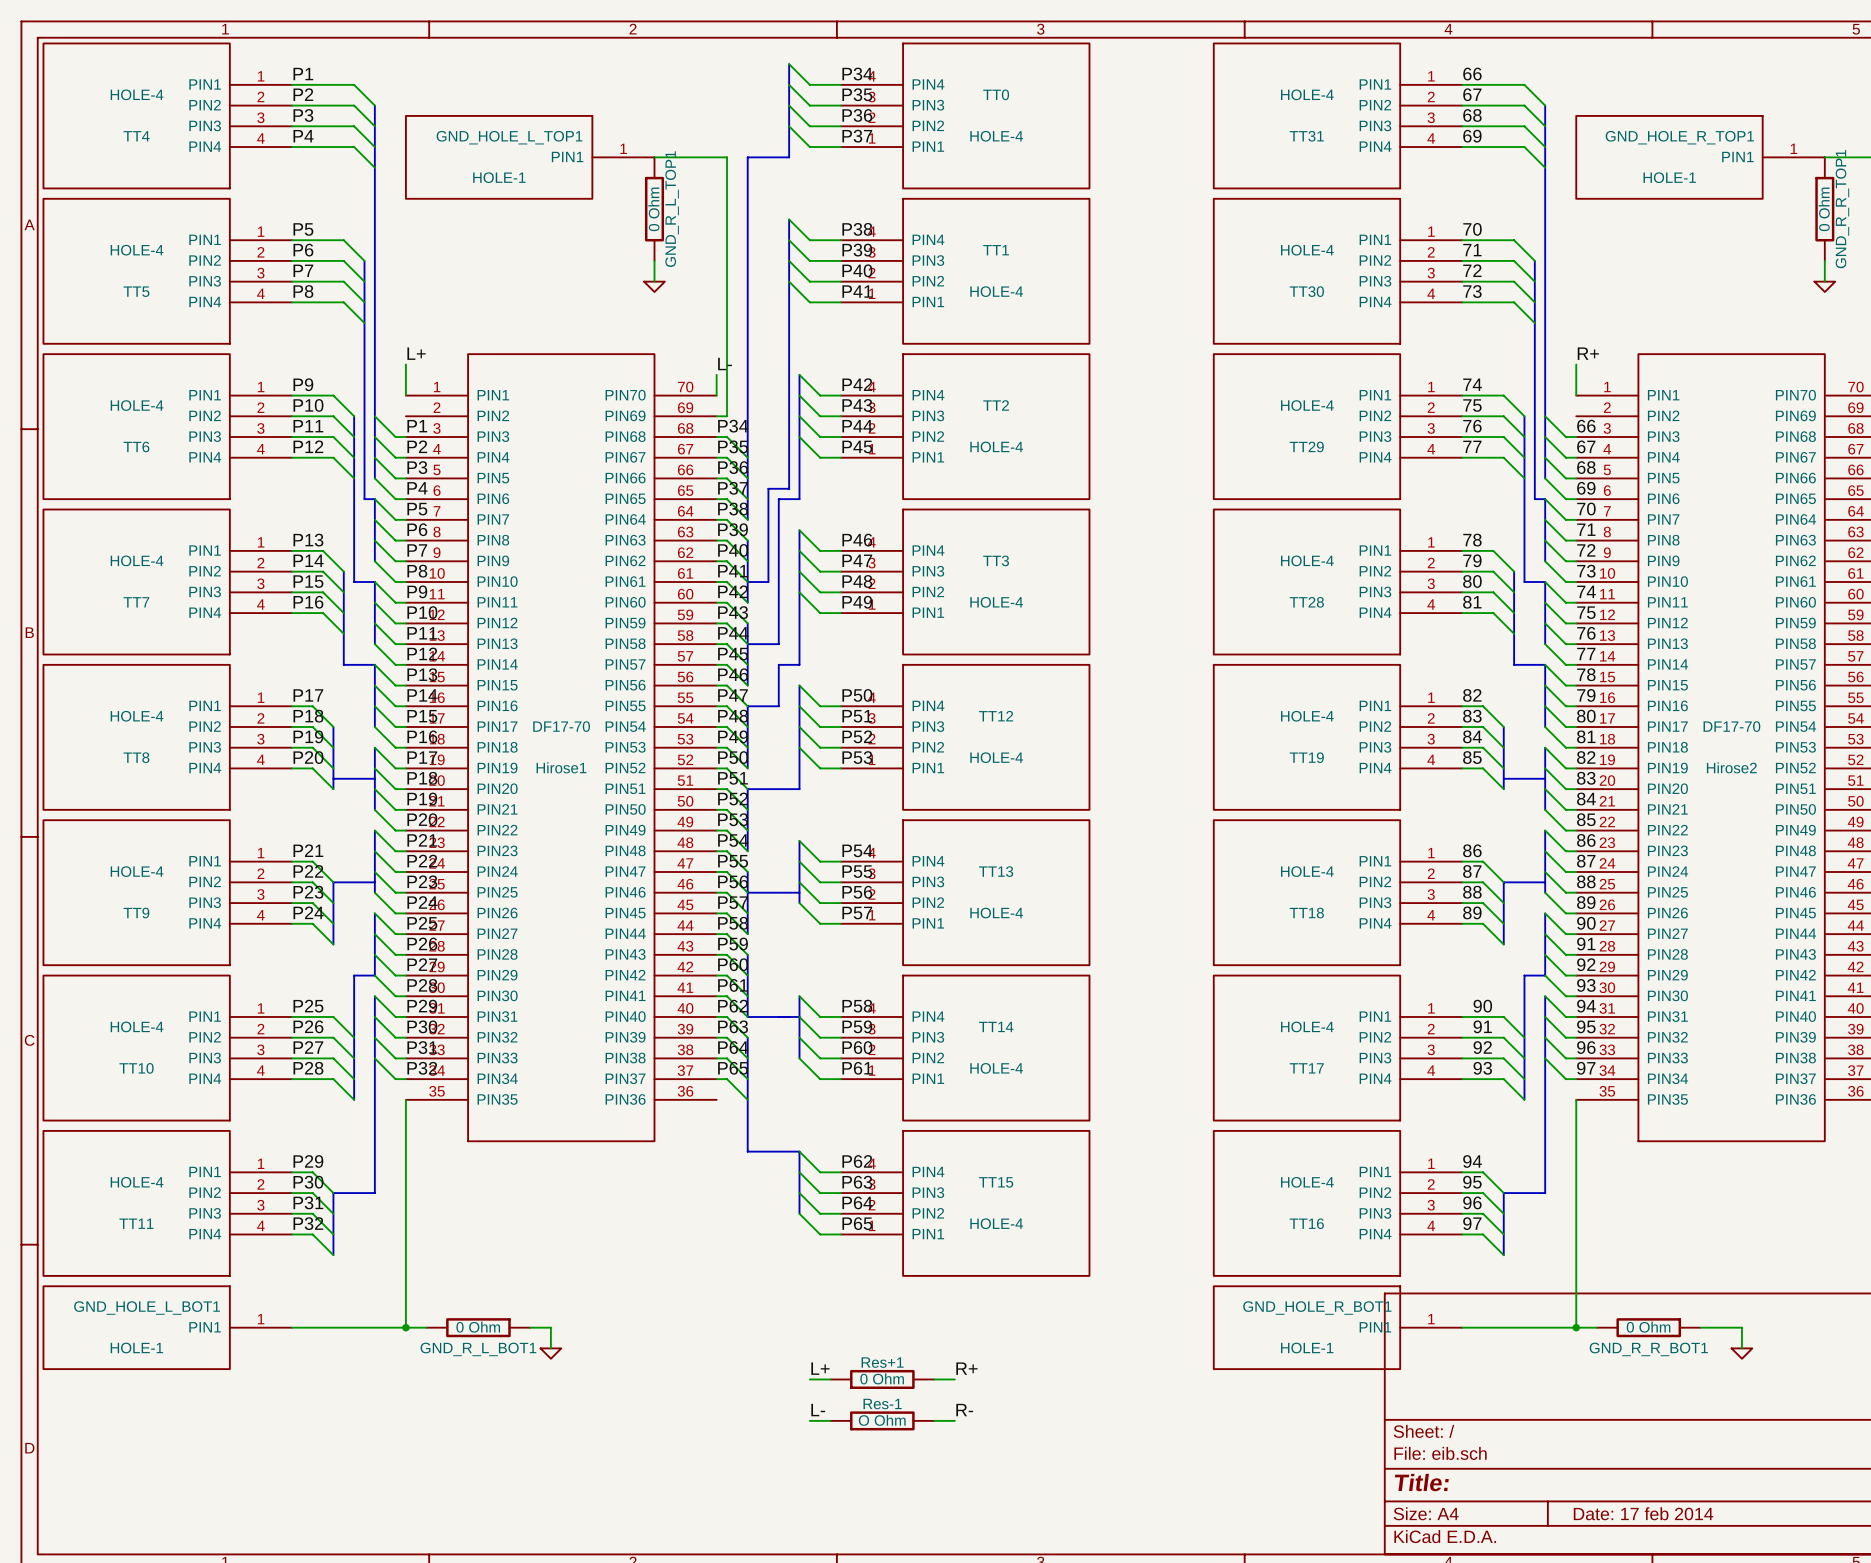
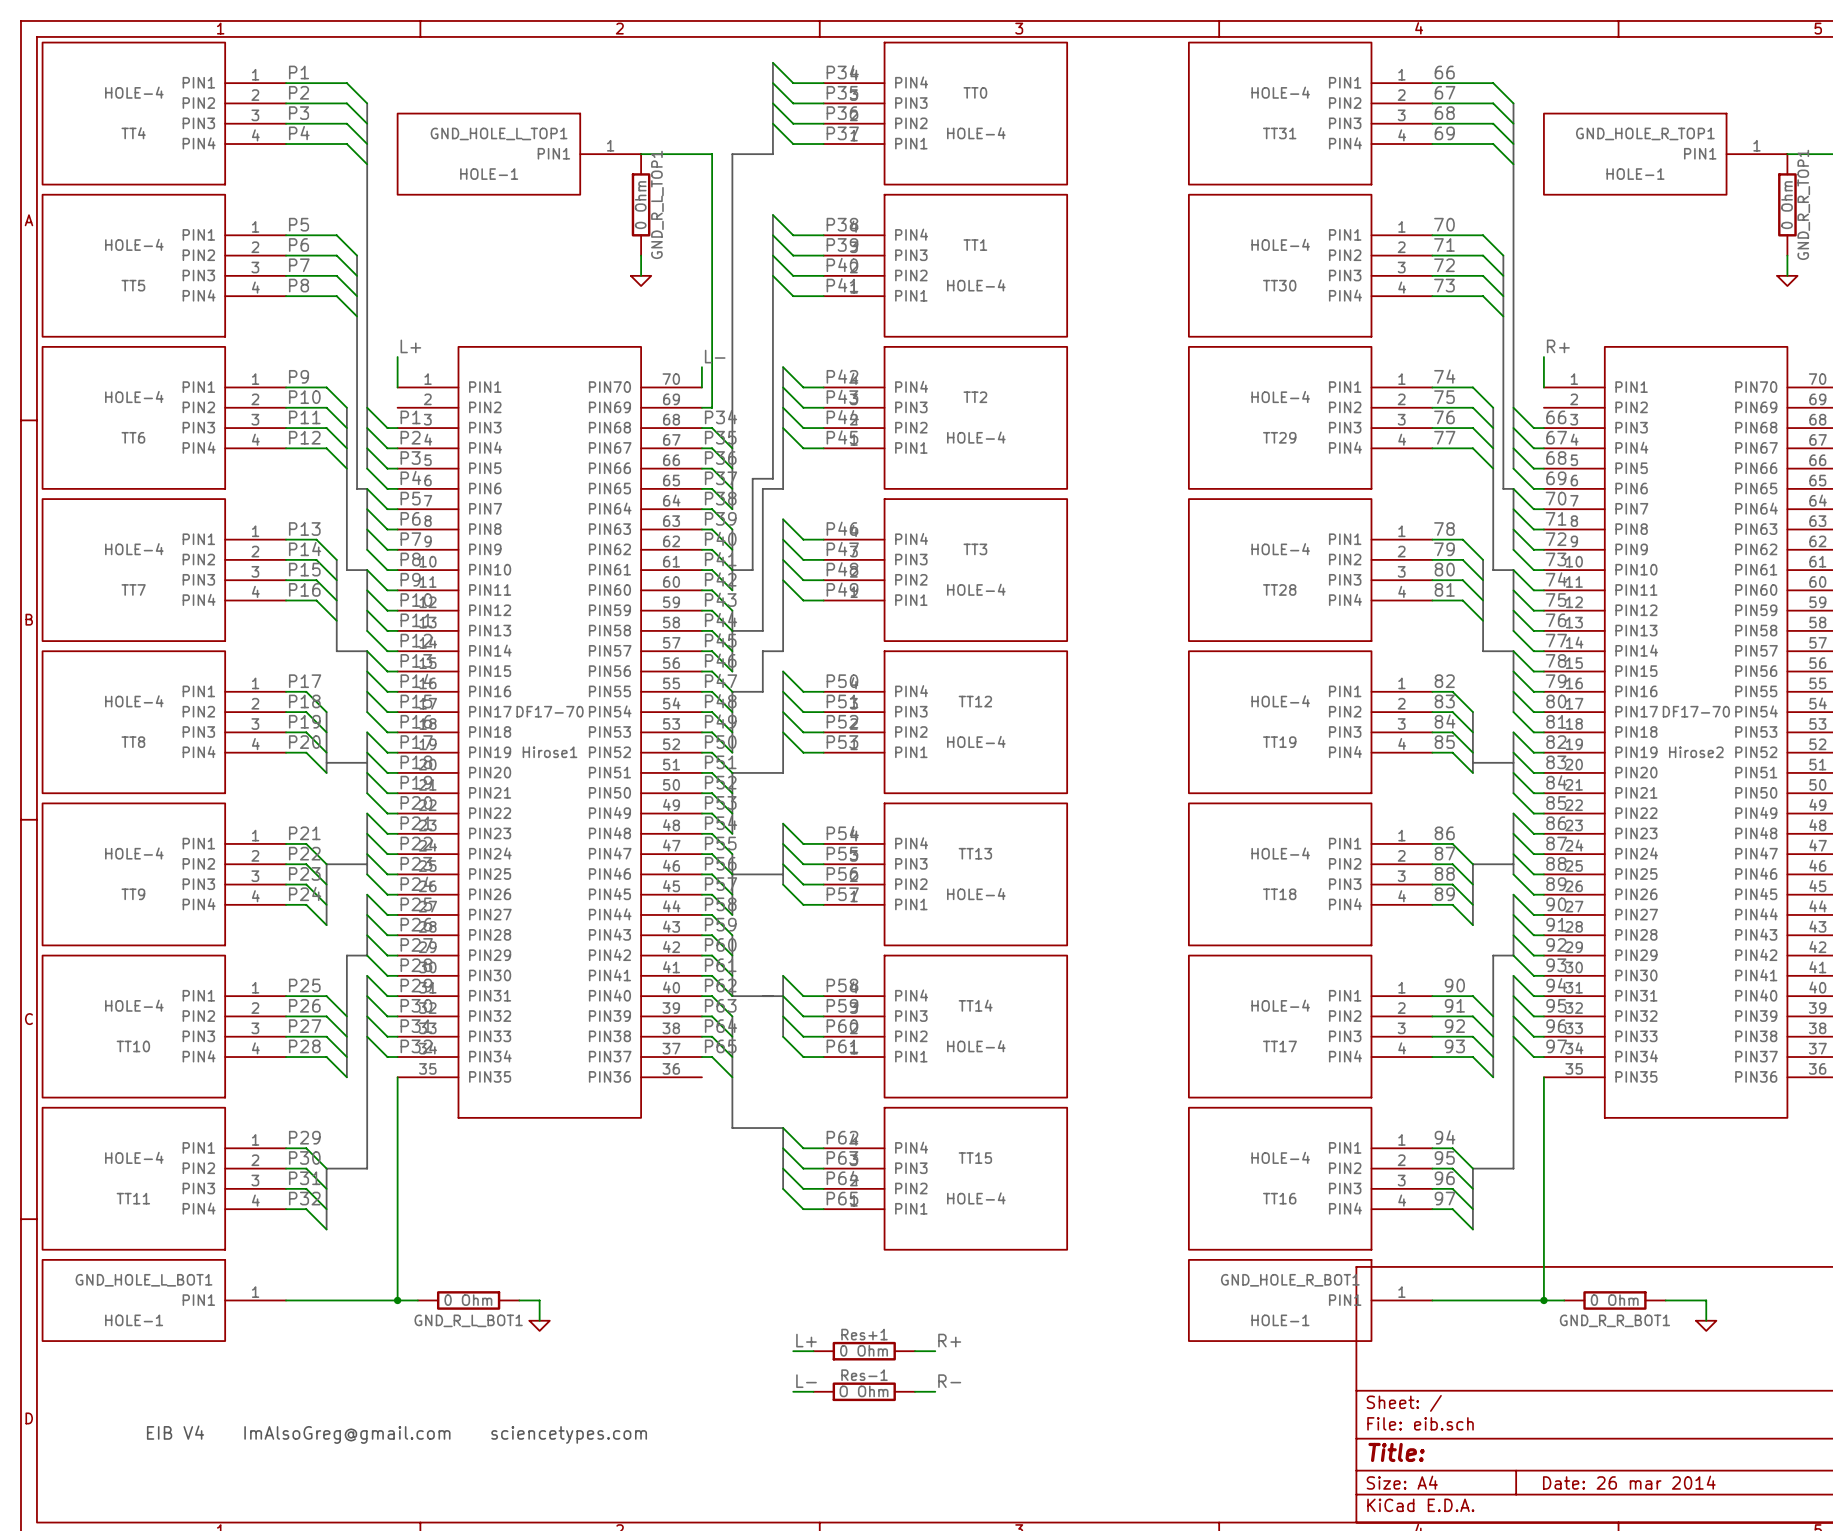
text: none -> EIB V4 ImAlsoGreg@gmail.com sciencetypes.com (396, 1434)
title block: Date: 17 feb 2014 (1643, 1513) -> Date: 26 mar 2014 (1629, 1482)

